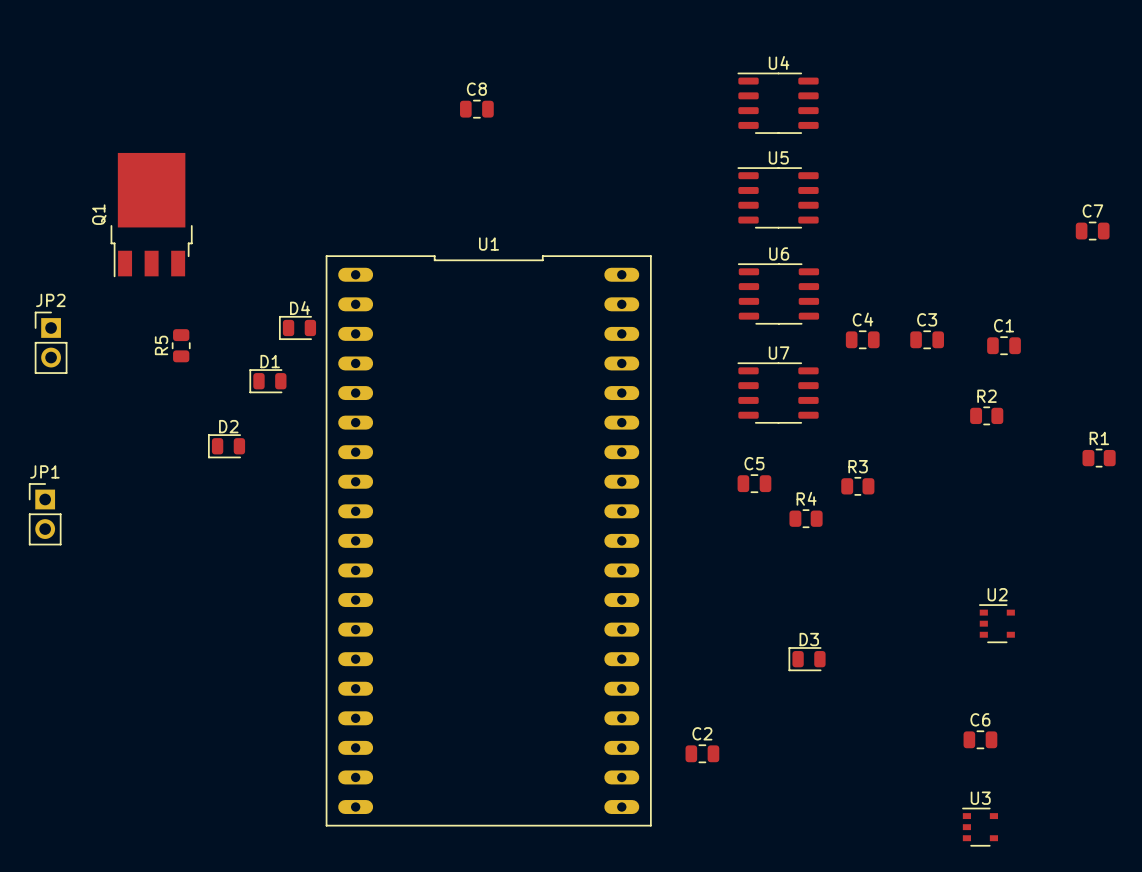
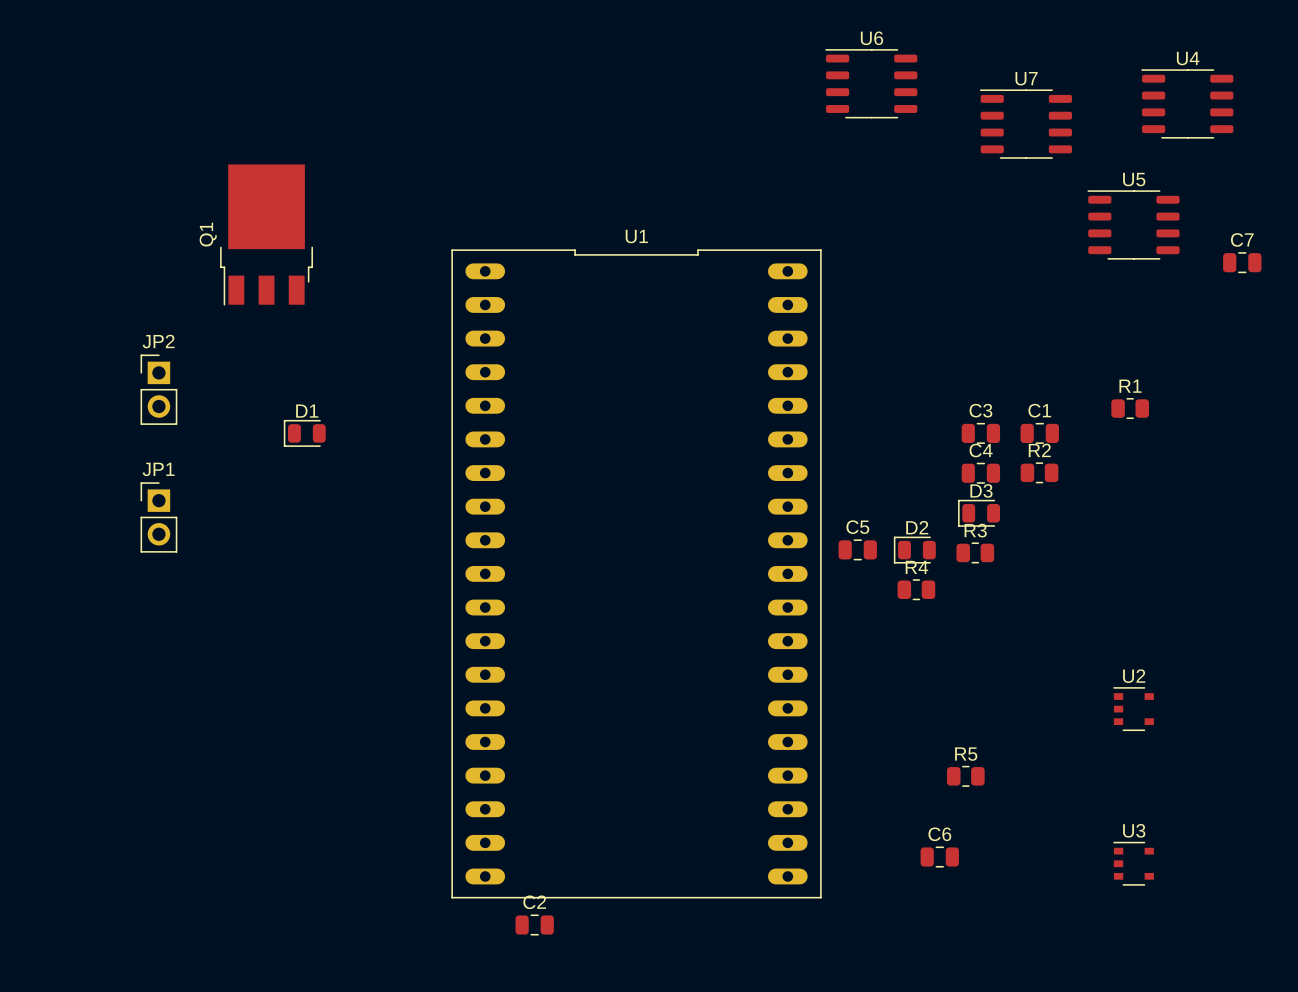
U4 position: (778, 103) -> (1187, 103)
C8: (476, 109) -> none
U5 position: (778, 197) -> (1133, 224)
Q1 position: (151, 214) -> (266, 234)
U6 position: (778, 293) -> (871, 83)
D4: (297, 327) -> none
C4 position: (862, 339) -> (980, 473)
C3 position: (927, 339) -> (980, 433)
JP2 position: (51, 342) -> (158, 389)
R5 rotation: 0° (181, 345) -> 90° clockwise (965, 776)
R5 position: (181, 345) -> (965, 776)
C1 position: (1004, 345) -> (1039, 433)
U7 position: (778, 393) -> (1025, 124)
R2 position: (986, 415) -> (1039, 472)
D2 position: (226, 446) -> (914, 550)
R1 position: (1099, 458) -> (1130, 408)
JP1 position: (45, 514) -> (158, 517)
U1 position: (488, 540) -> (636, 573)
D3 position: (807, 659) -> (979, 513)
C6 position: (980, 739) -> (939, 857)
C2 position: (702, 753) -> (534, 925)
U3 position: (980, 827) -> (1133, 863)

